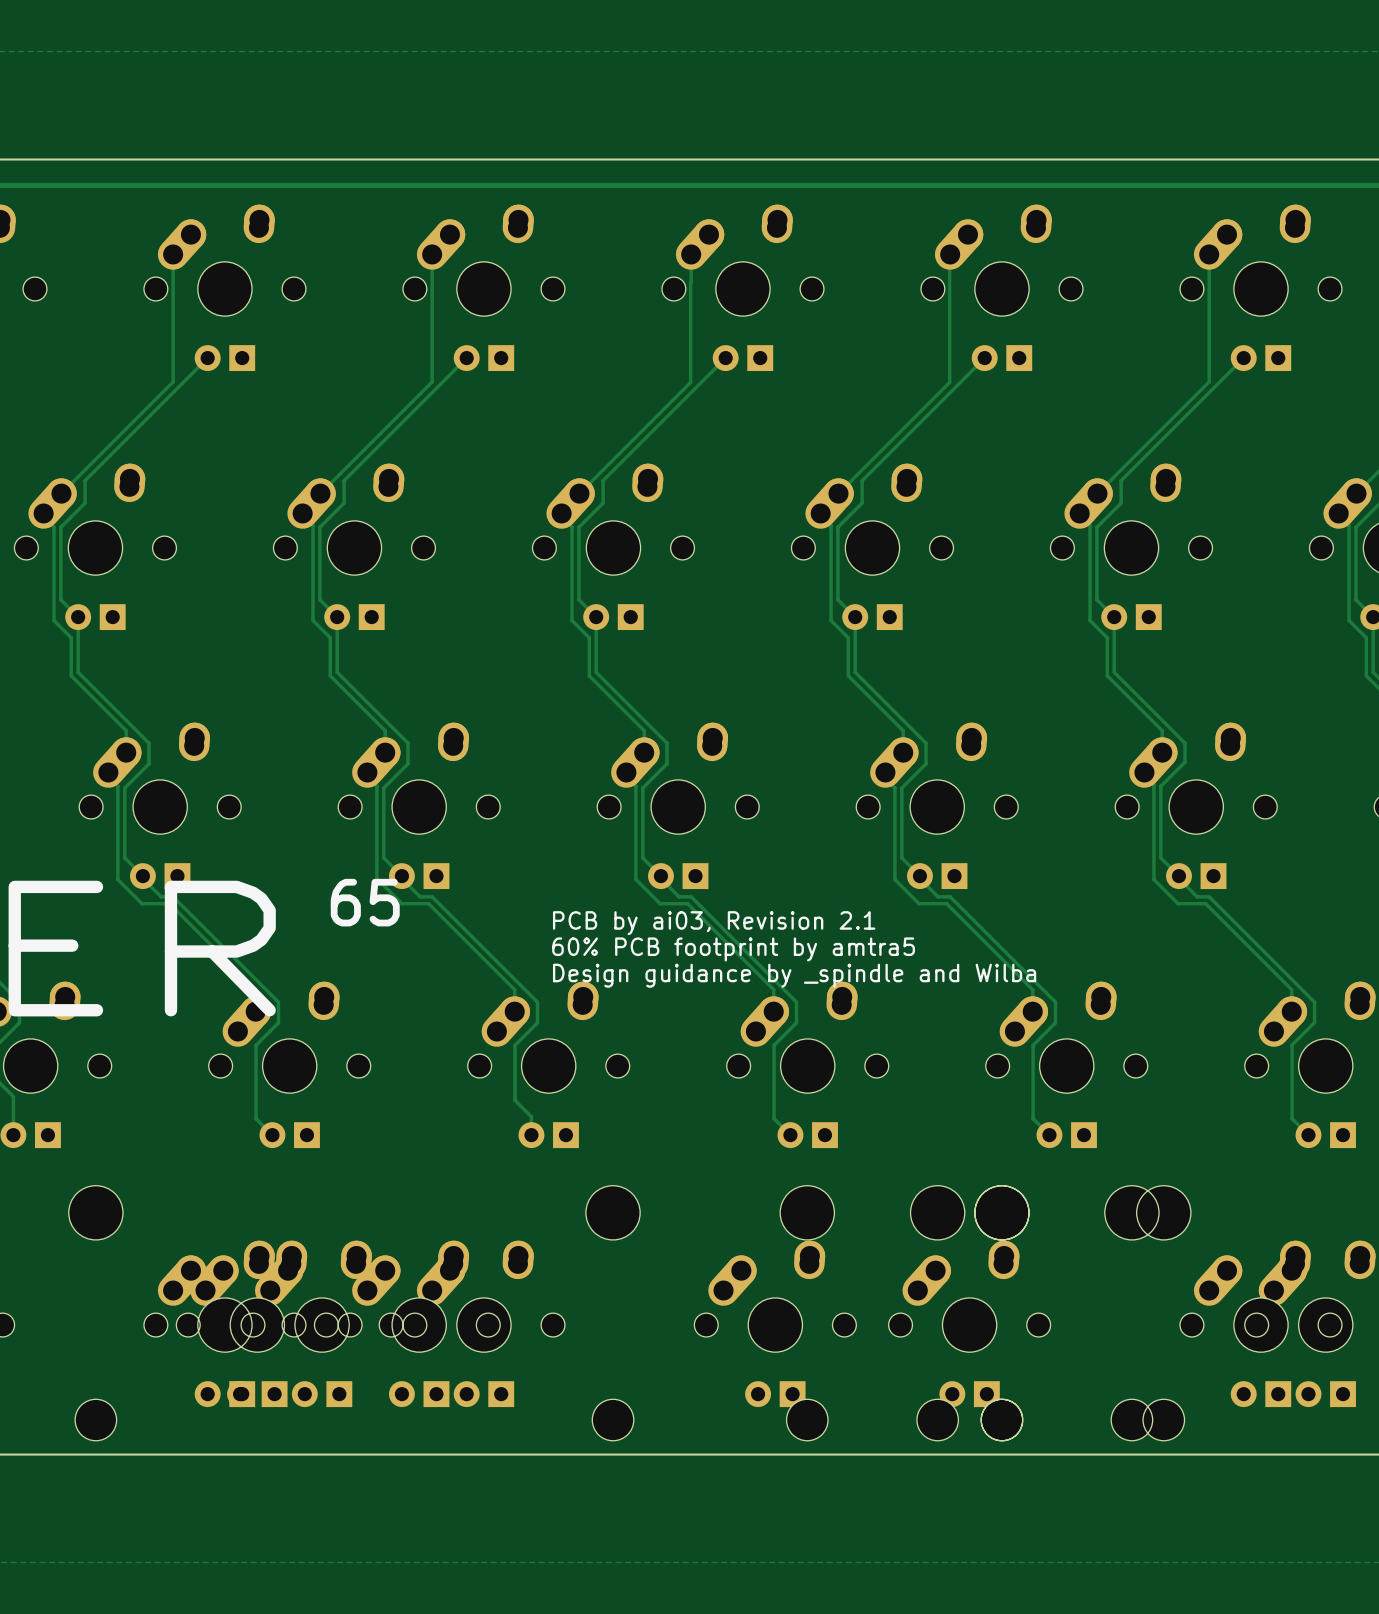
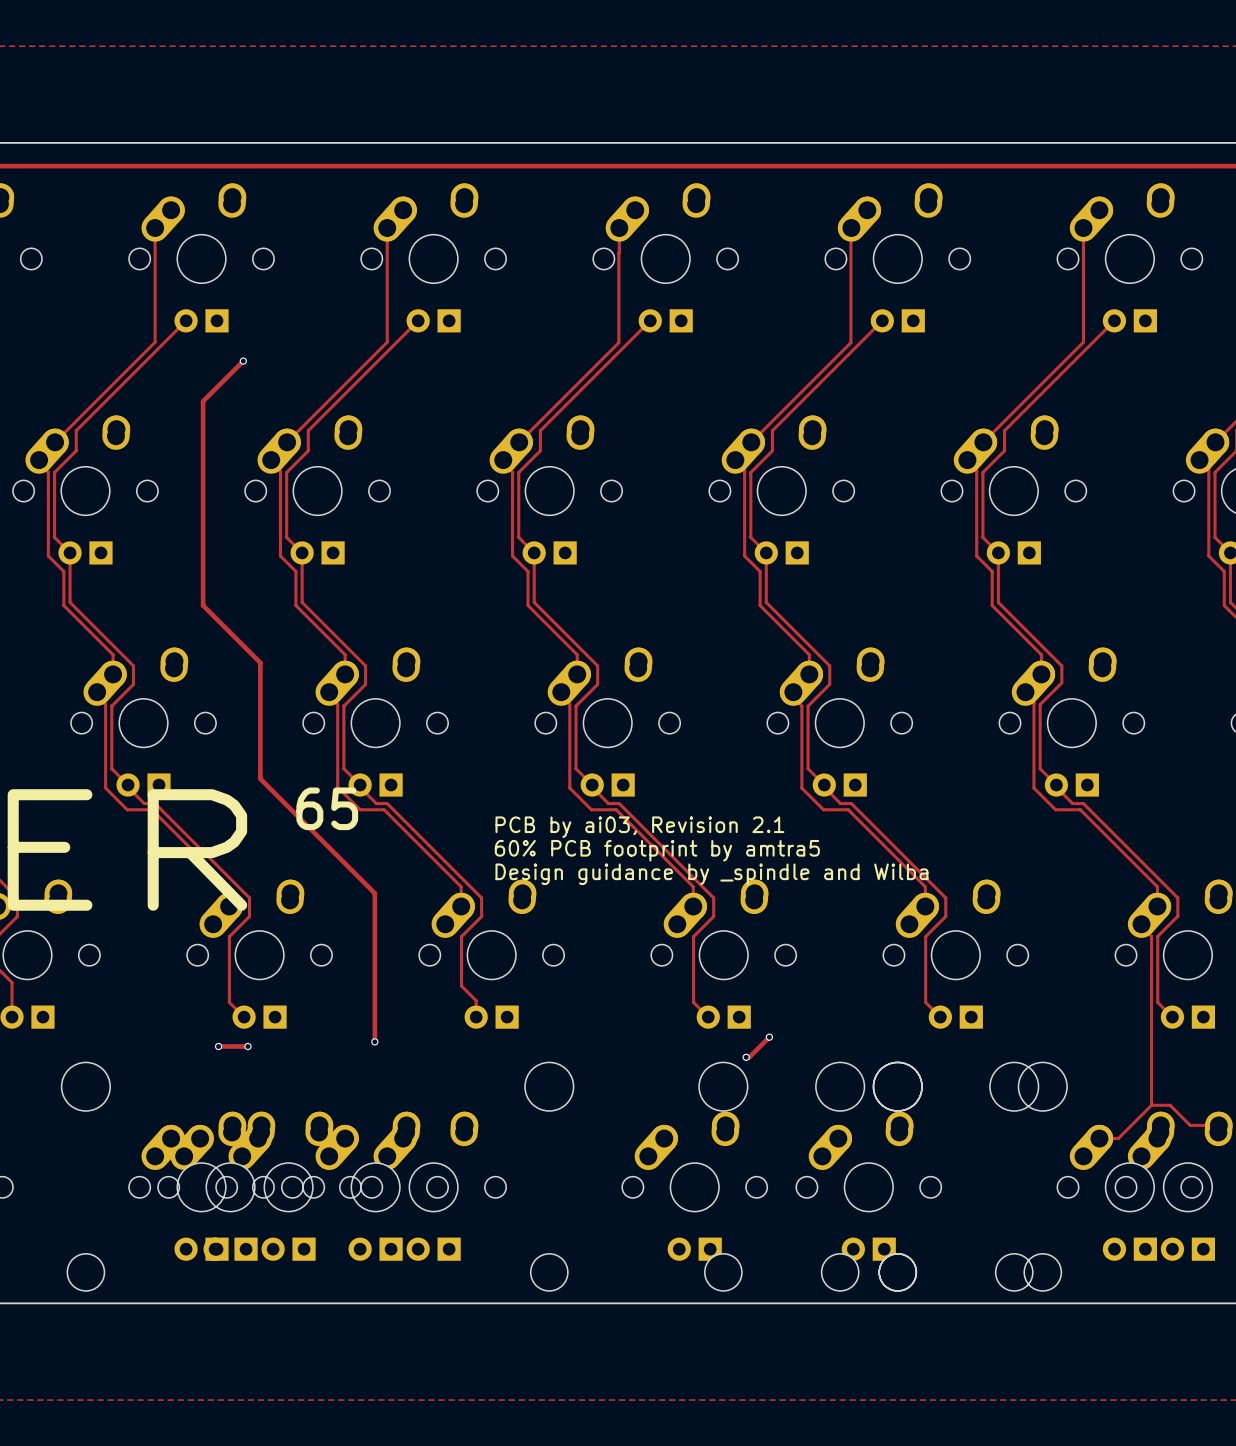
track: none -> (243, 361) (203, 401) (203, 605) (260, 662) (260, 778) (374, 893) (374, 1041)
via: none -> (243, 361)
track: none -> (1141, 924) (1151, 936) (1151, 1105)
track: none -> (769, 1037) (749, 1057) (746, 1057)
via: none -> (769, 1037)
via: none -> (374, 1041)
track: none -> (218, 1046) (247, 1046)
via: none -> (218, 1046)
via: none -> (247, 1046)
via: none -> (746, 1057)
track: none -> (1151, 1105) (1118, 1138) (1099, 1138)
track: none -> (1151, 1105) (1170, 1105) (1190, 1125) (1218, 1125)

